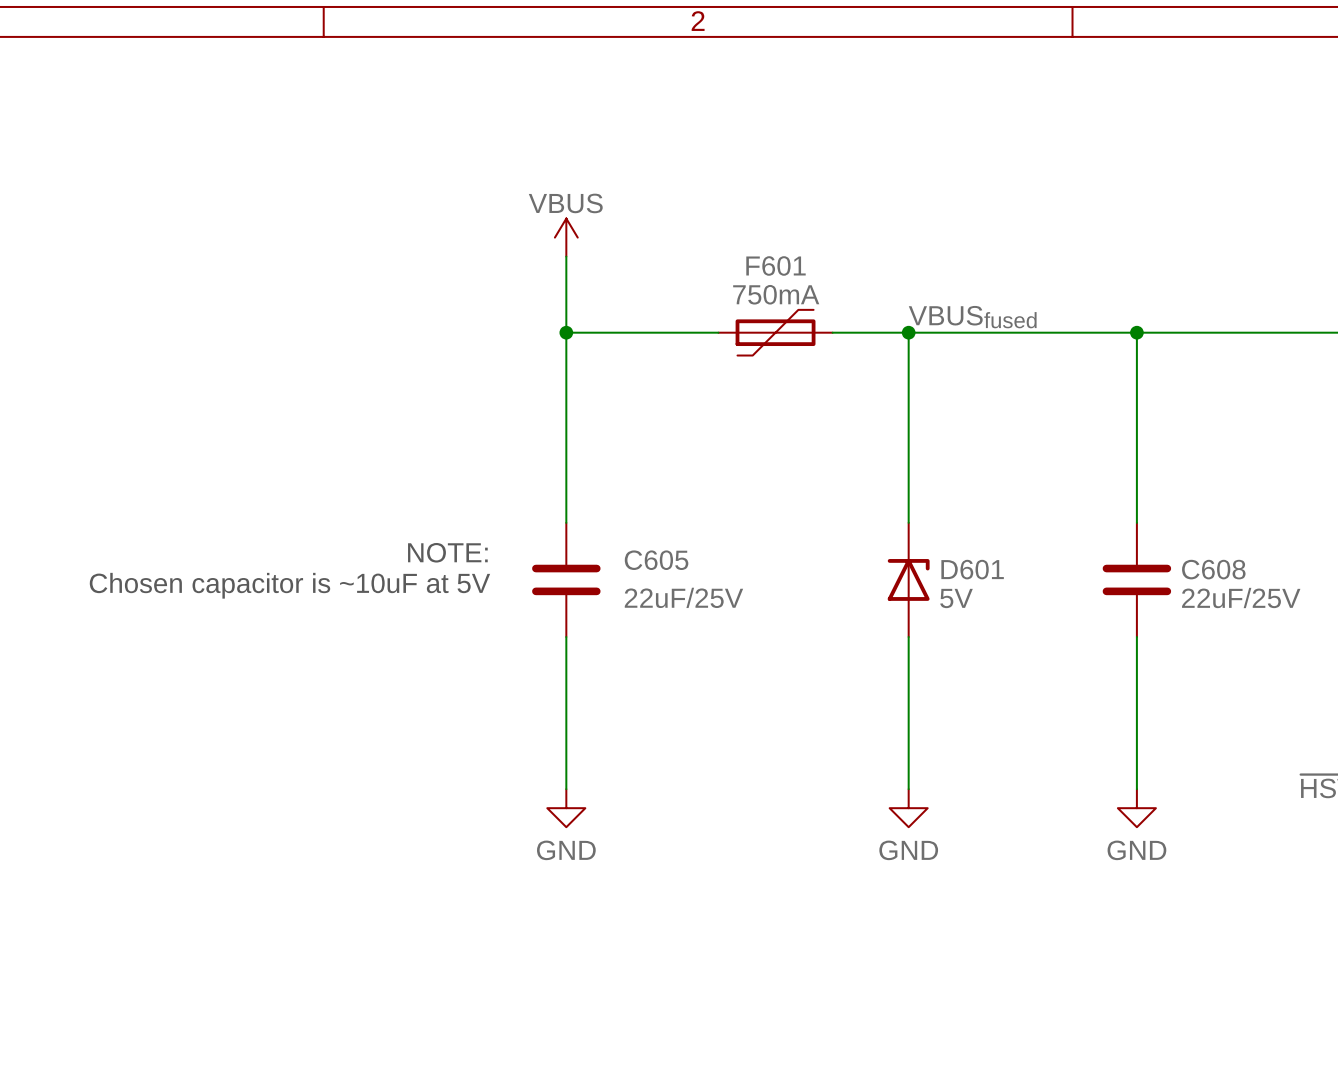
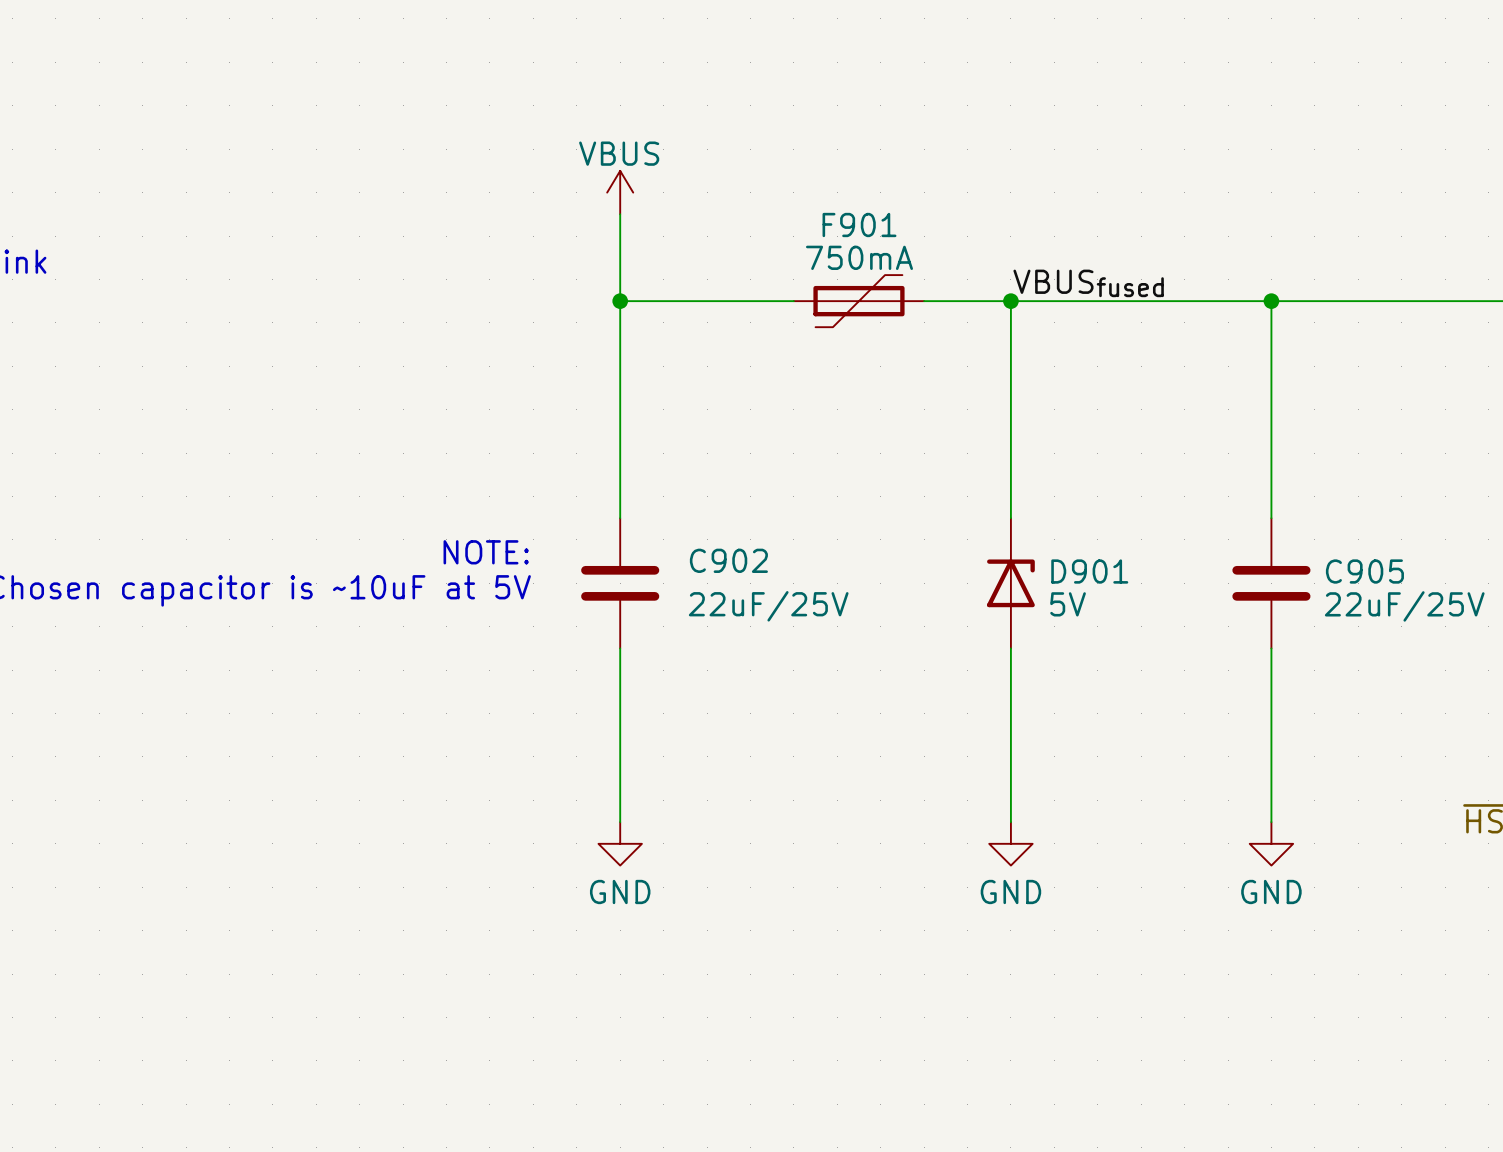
F601 name: F601 (776, 265) -> F901 (859, 225)
C605 name: C605 (656, 560) -> C902 (728, 560)
D601 name: D601 (972, 569) -> D901 (1089, 571)
C608 name: C608 (1213, 569) -> C905 (1364, 571)

